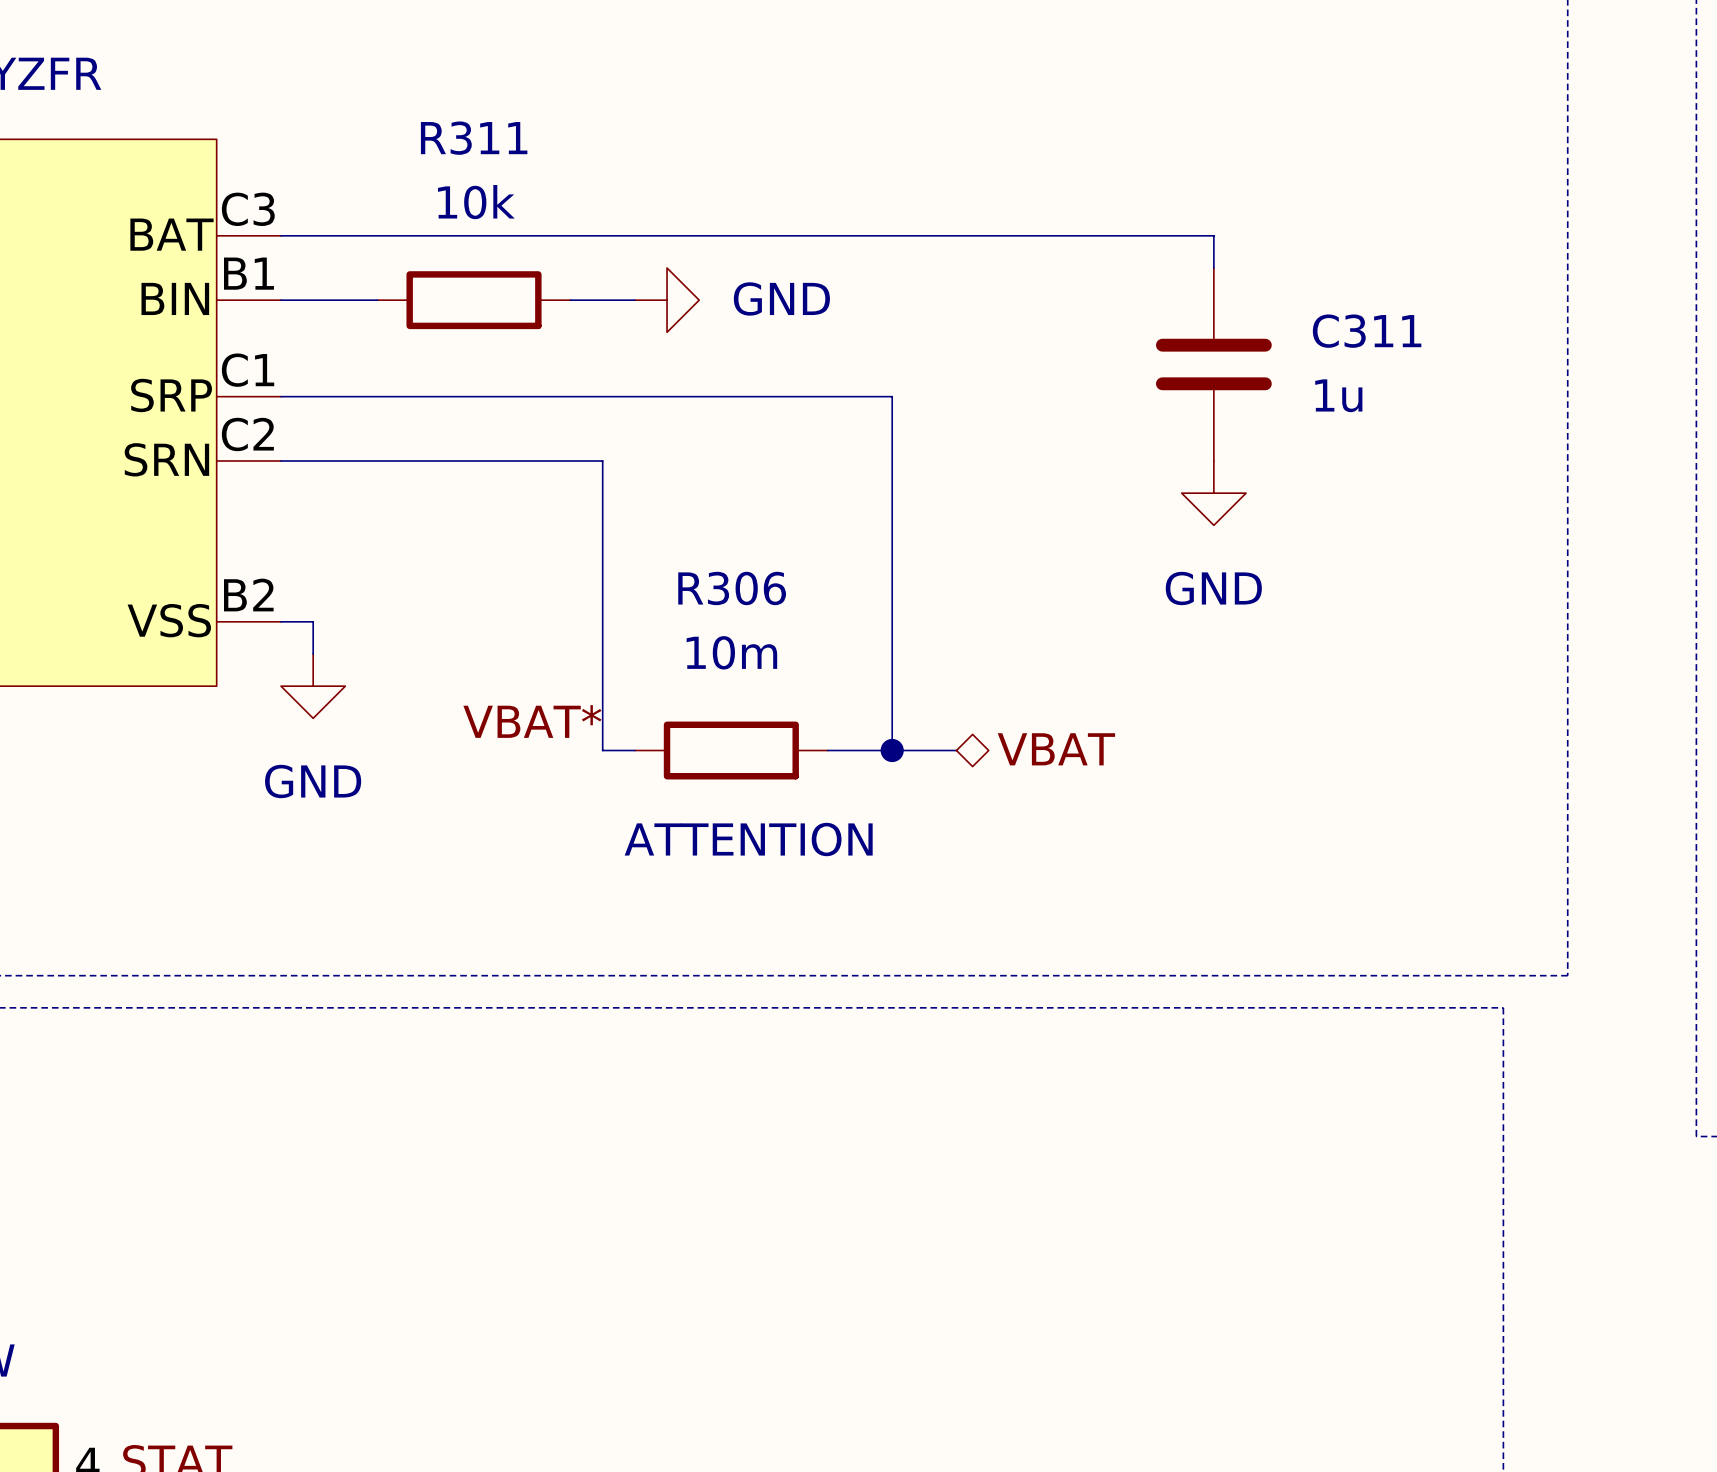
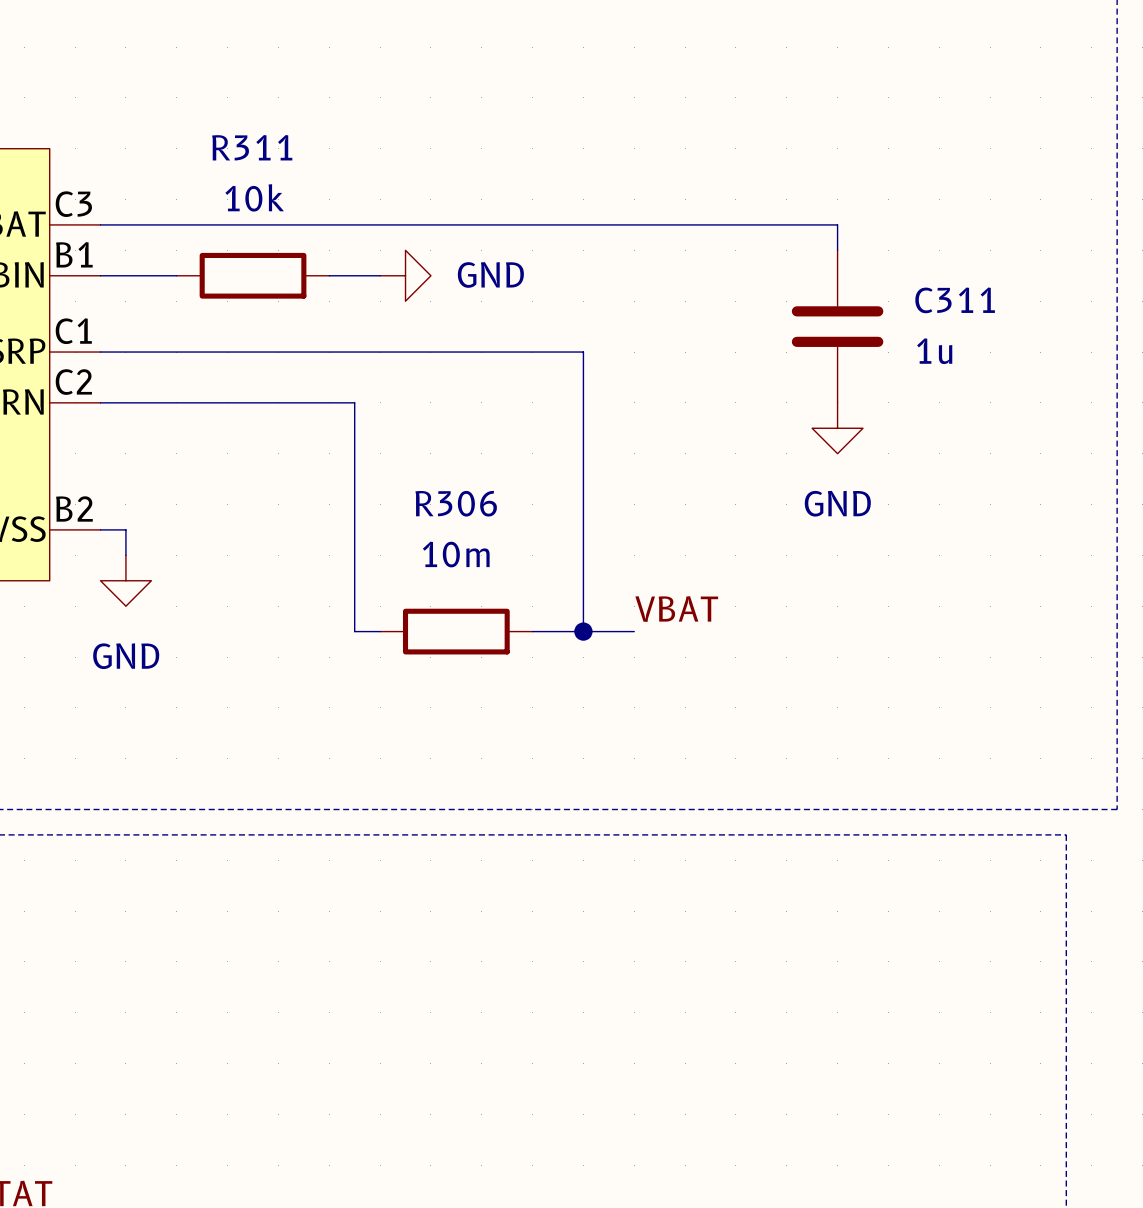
label: VBAT* (532, 721) -> none
label: none -> VBAT (676, 609)
hierarchical label: VBAT (1056, 749) -> none
text: ATTENTION (748, 839) -> none

